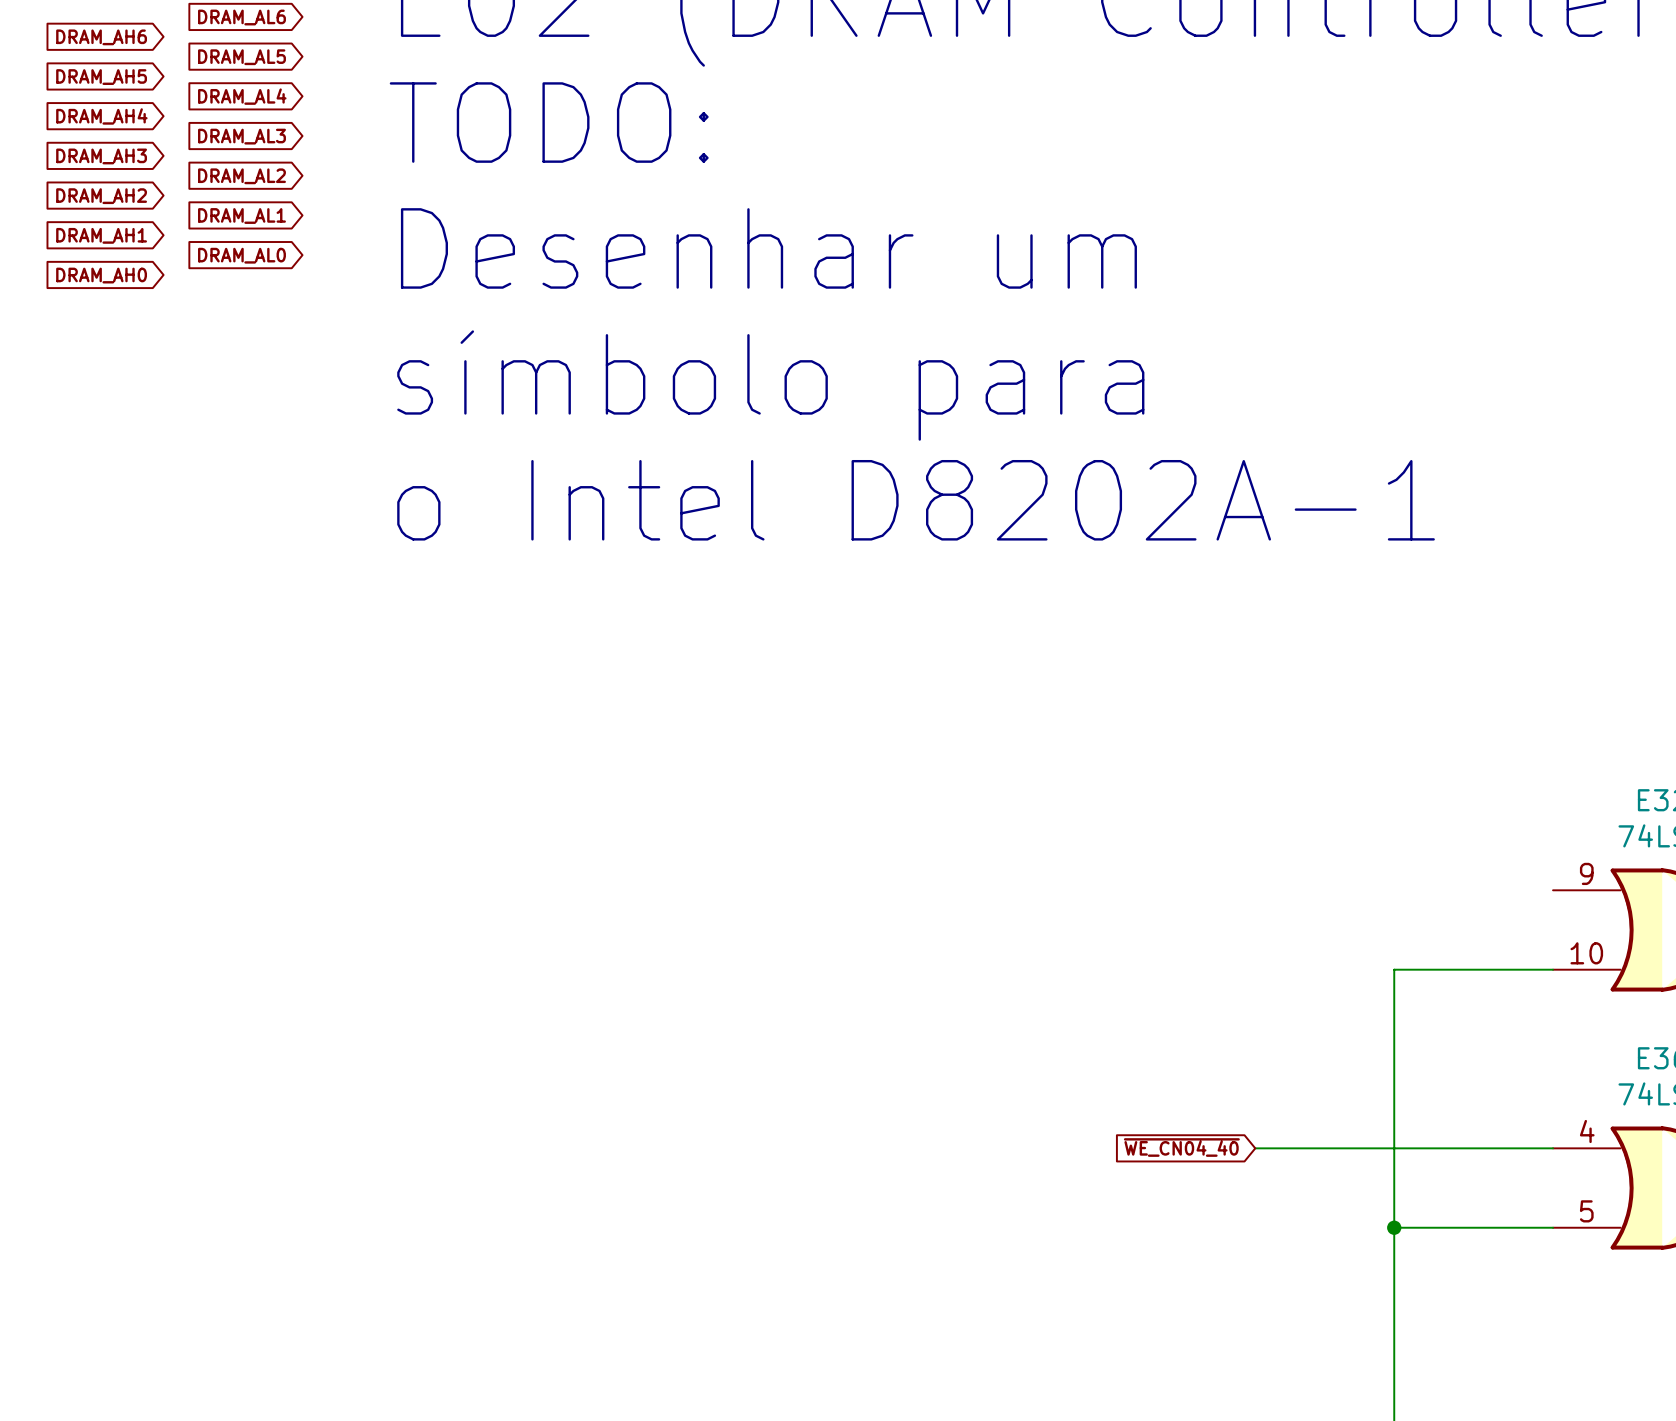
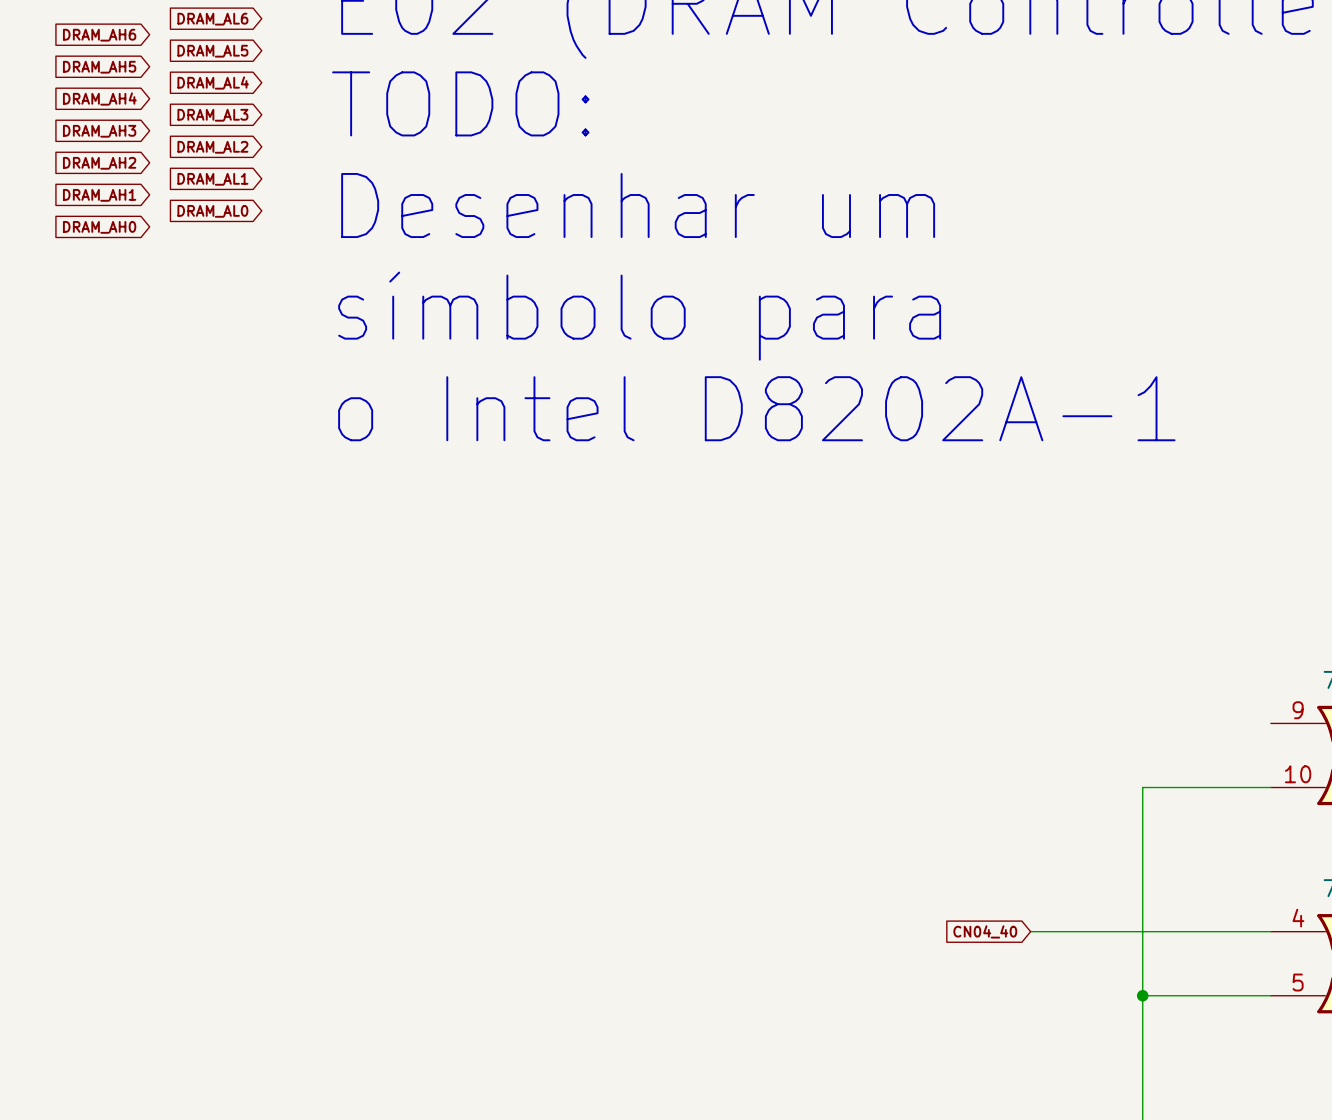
global label: ~{WE_CN04_40} (1181, 1147) -> CN04_40 (985, 931)

